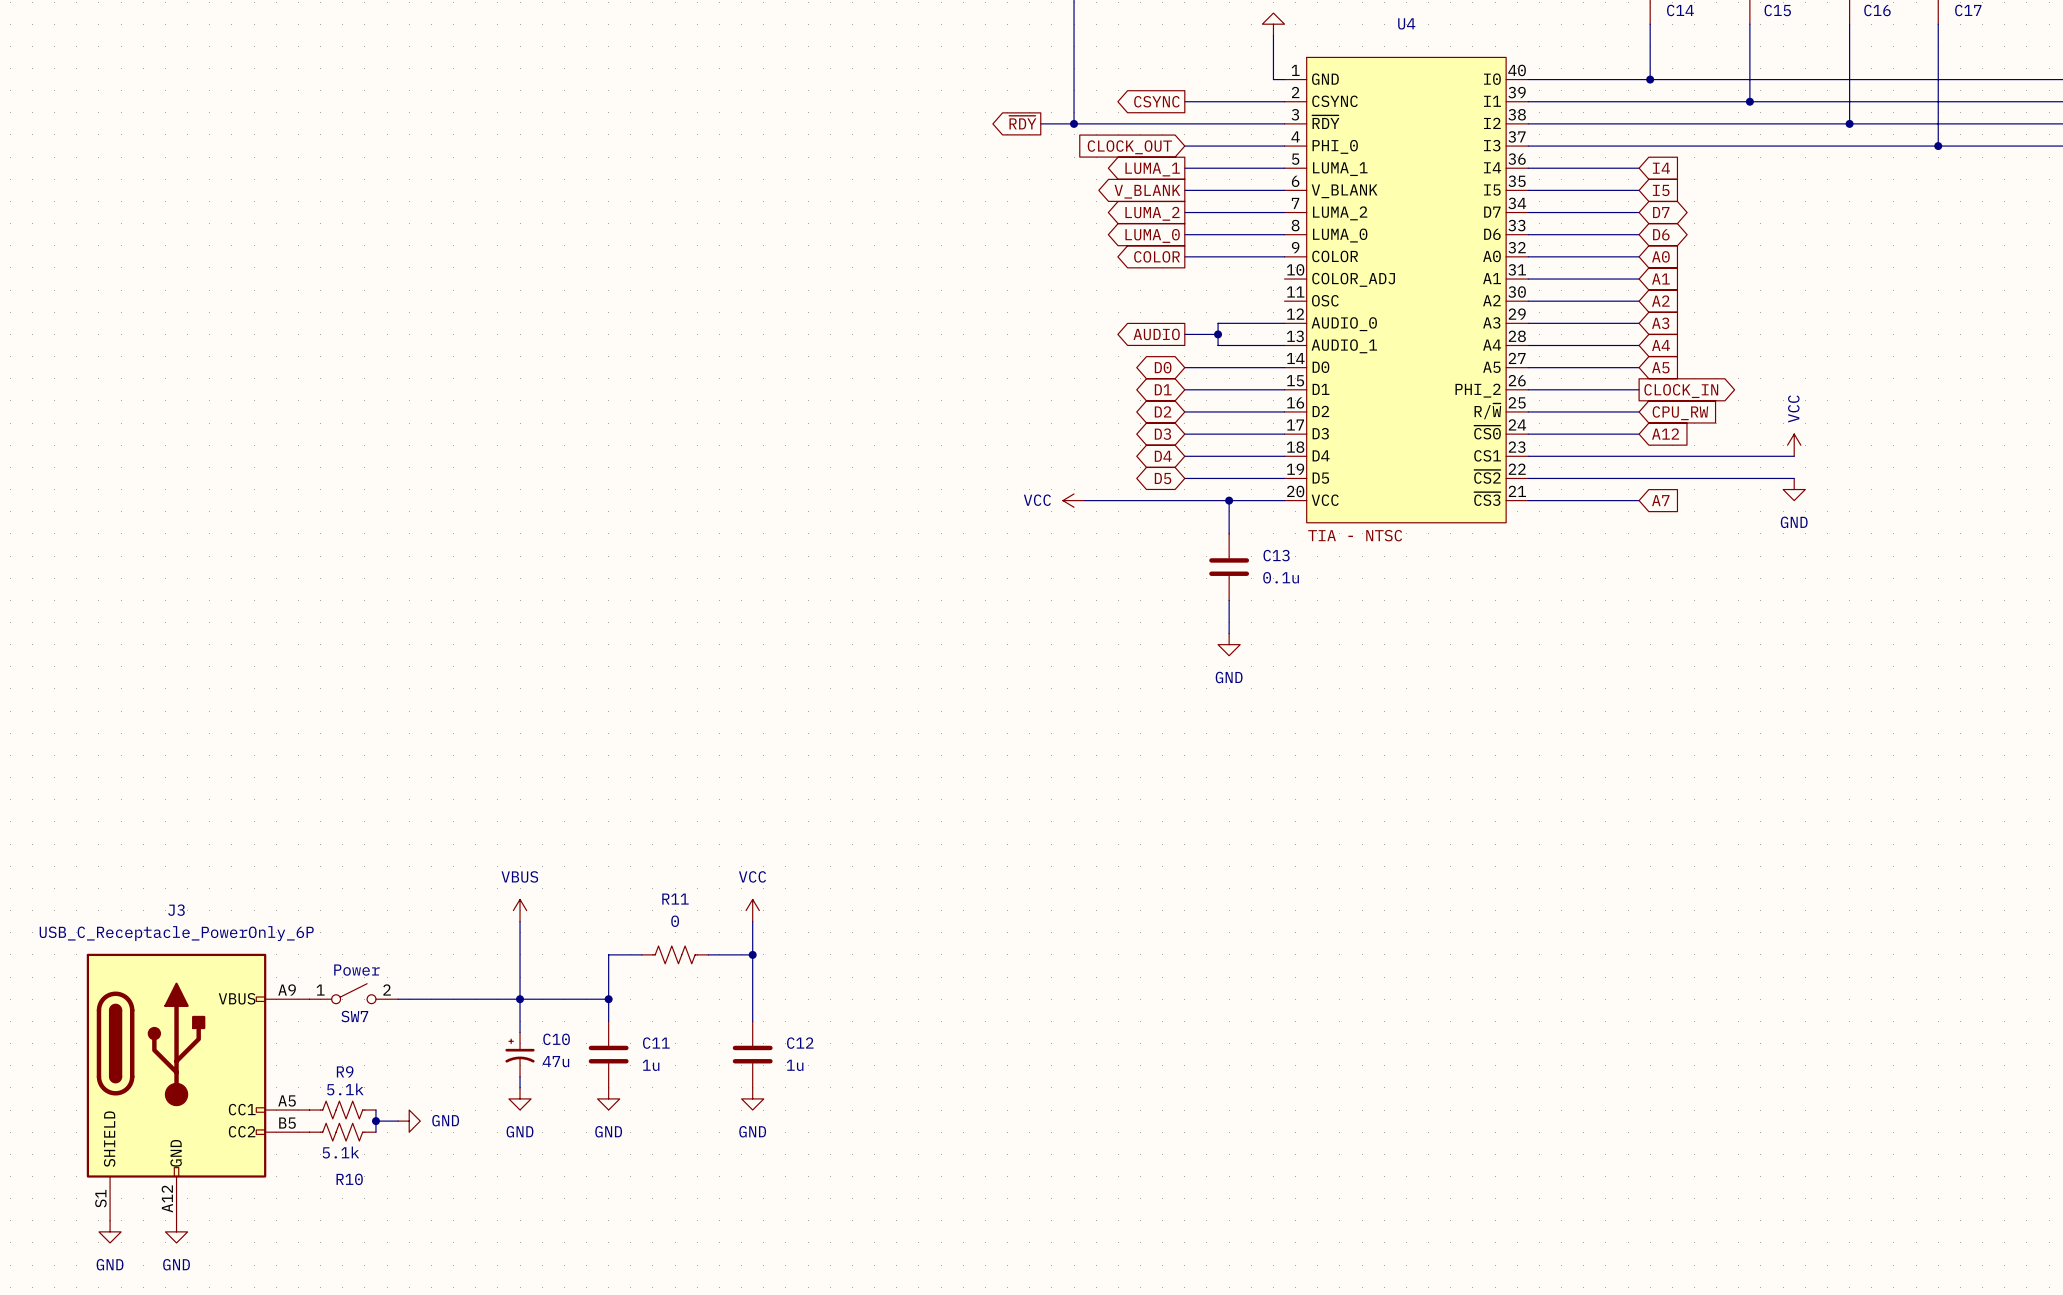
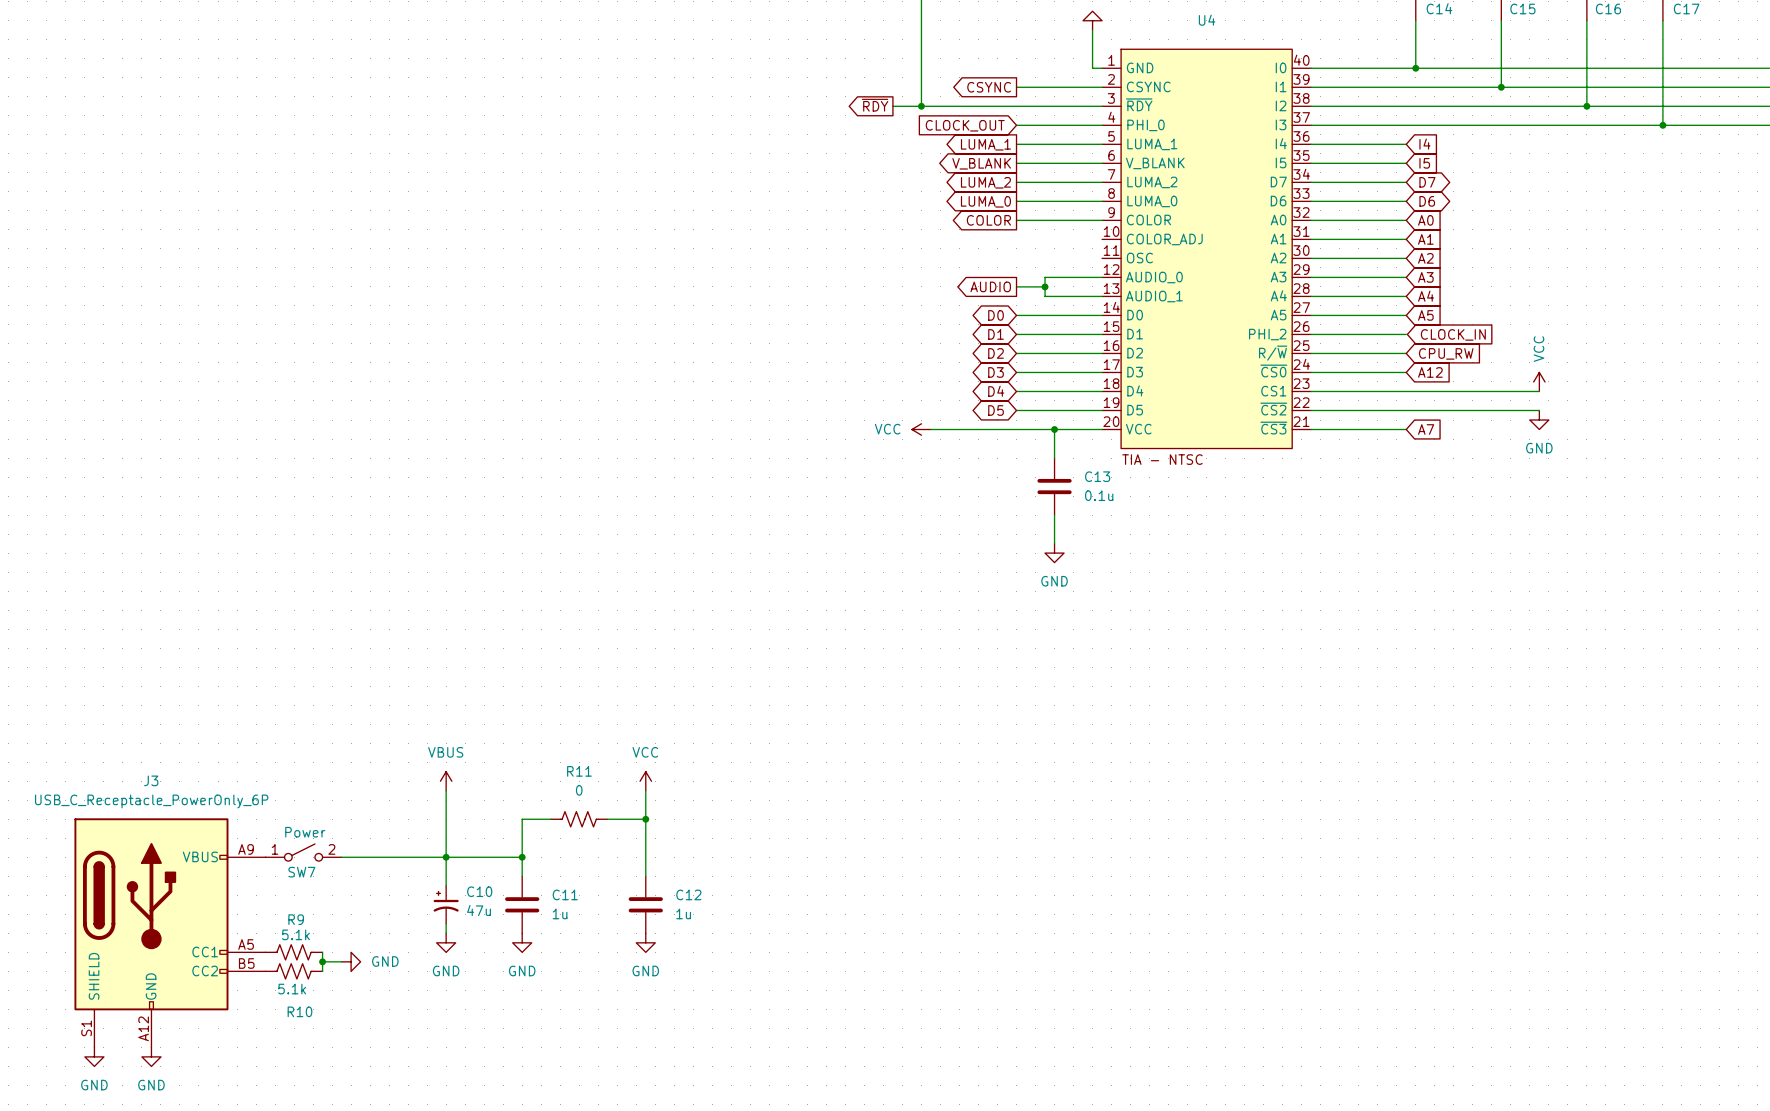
global label rotation: 0° (1681, 391) -> 180° (1453, 334)

